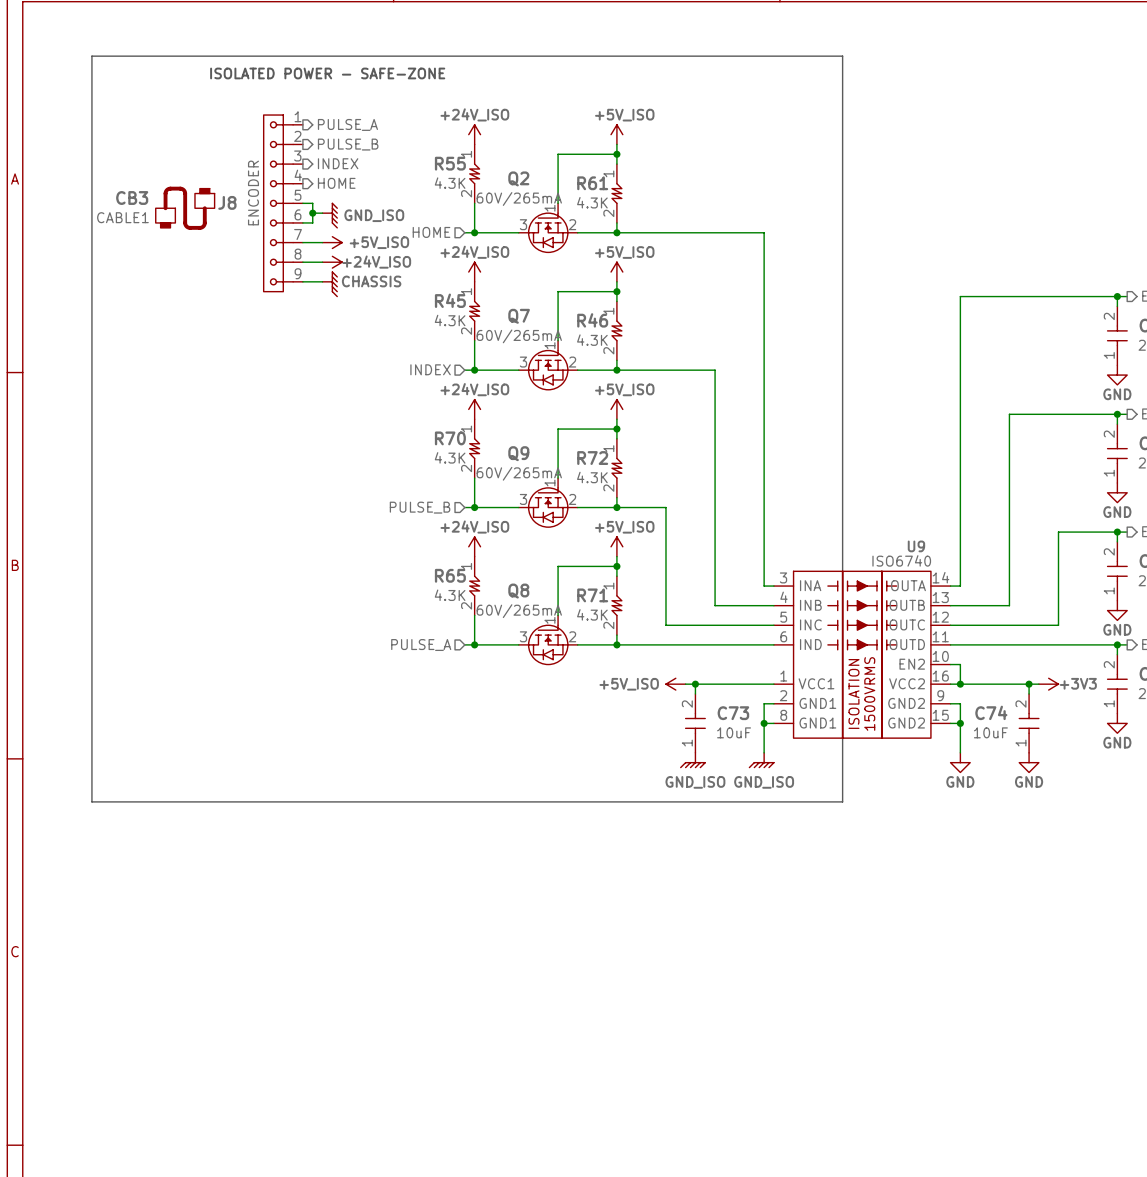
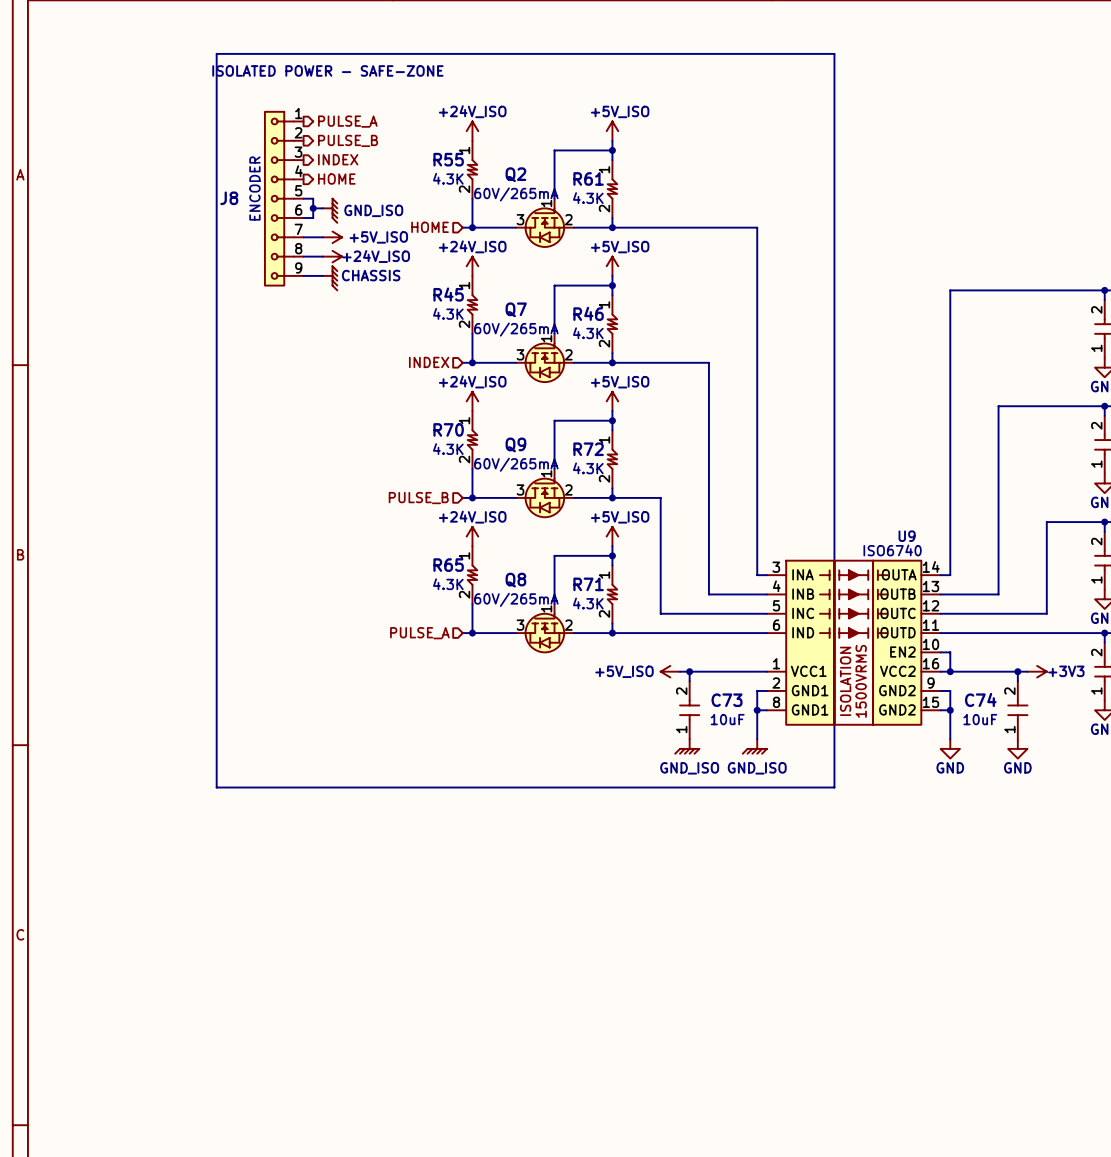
line: (214, 56) (91, 56) (91, 801) (214, 801) -> (216, 53) (216, 787)
CB3: CABLE1 (185, 208) -> none

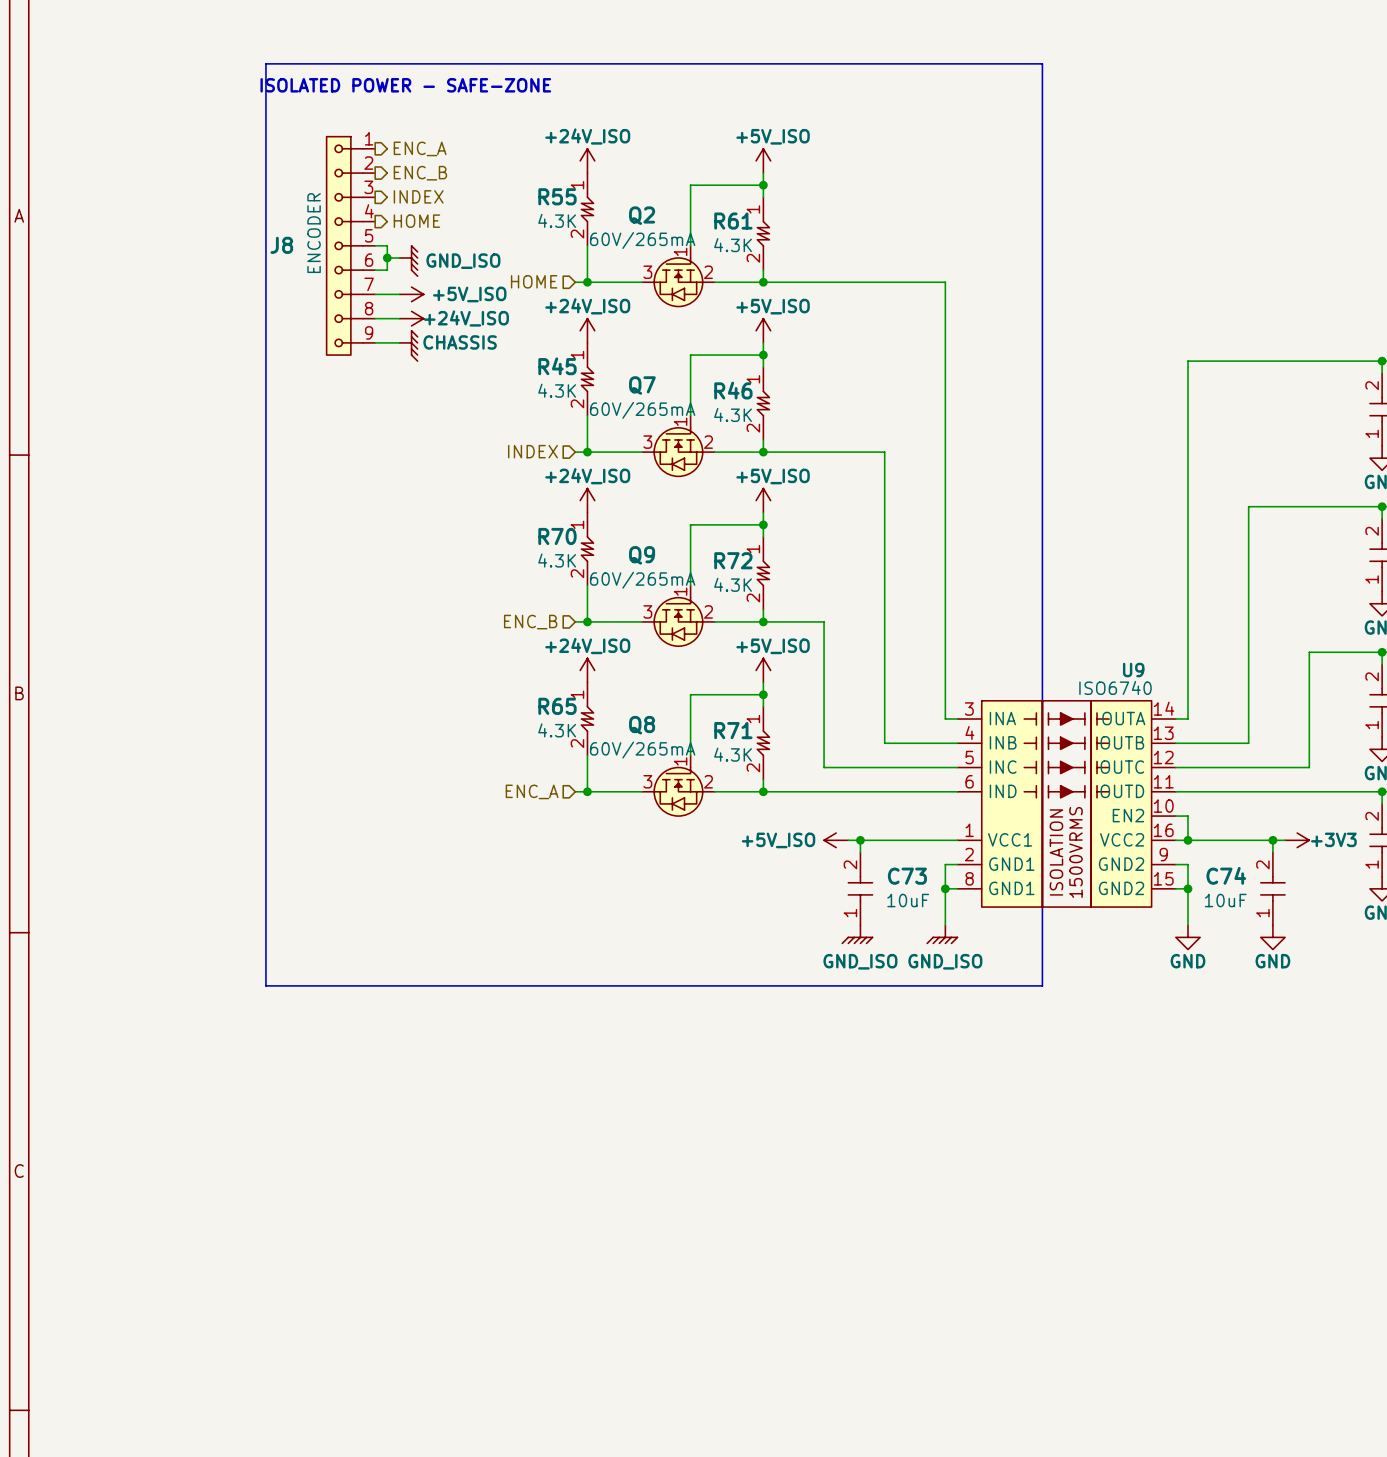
hierarchical label: PULSE_A (347, 121) -> ENC_A (420, 148)
hierarchical label: PULSE_B (348, 140) -> ENC_B (420, 173)
hierarchical label: PULSE_B (418, 498) -> ENC_B (530, 622)
hierarchical label: PULSE_A (419, 633) -> ENC_A (532, 791)

